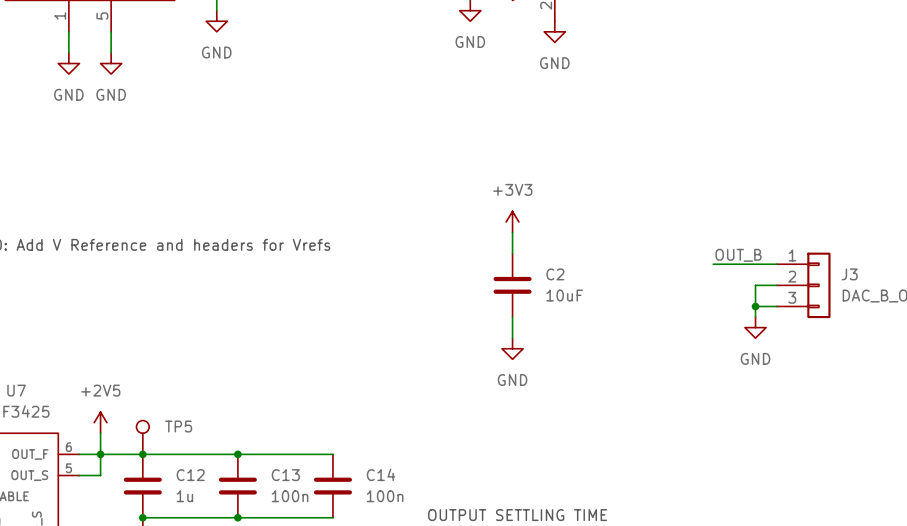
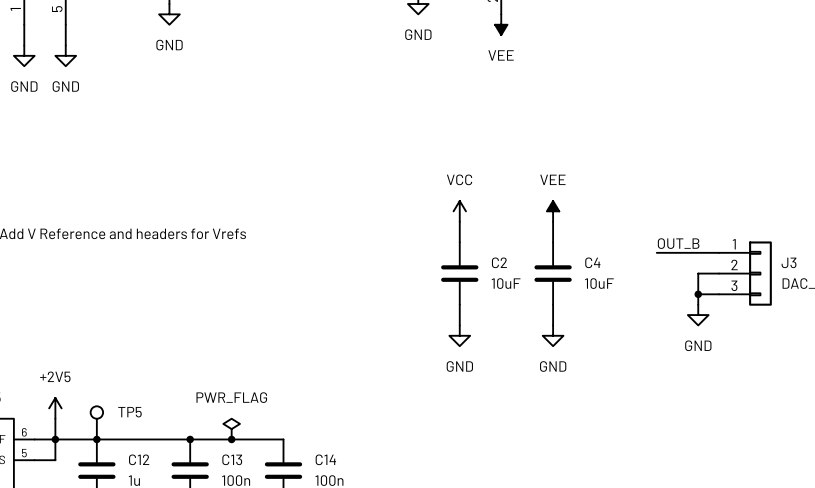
power symbol: GND (554, 31) -> VEE (501, 24)
power symbol: +3V3 (512, 221) -> VCC (459, 211)
power symbol: none -> VEE (553, 211)
wire: none -> (553, 221) (553, 242)
C4: none -> 10uF (553, 273)
wire: none -> (553, 304) (553, 325)
power symbol: none -> GND (553, 335)
power symbol: none -> PWR_FLAG (231, 429)
junction: none -> (231, 439)

